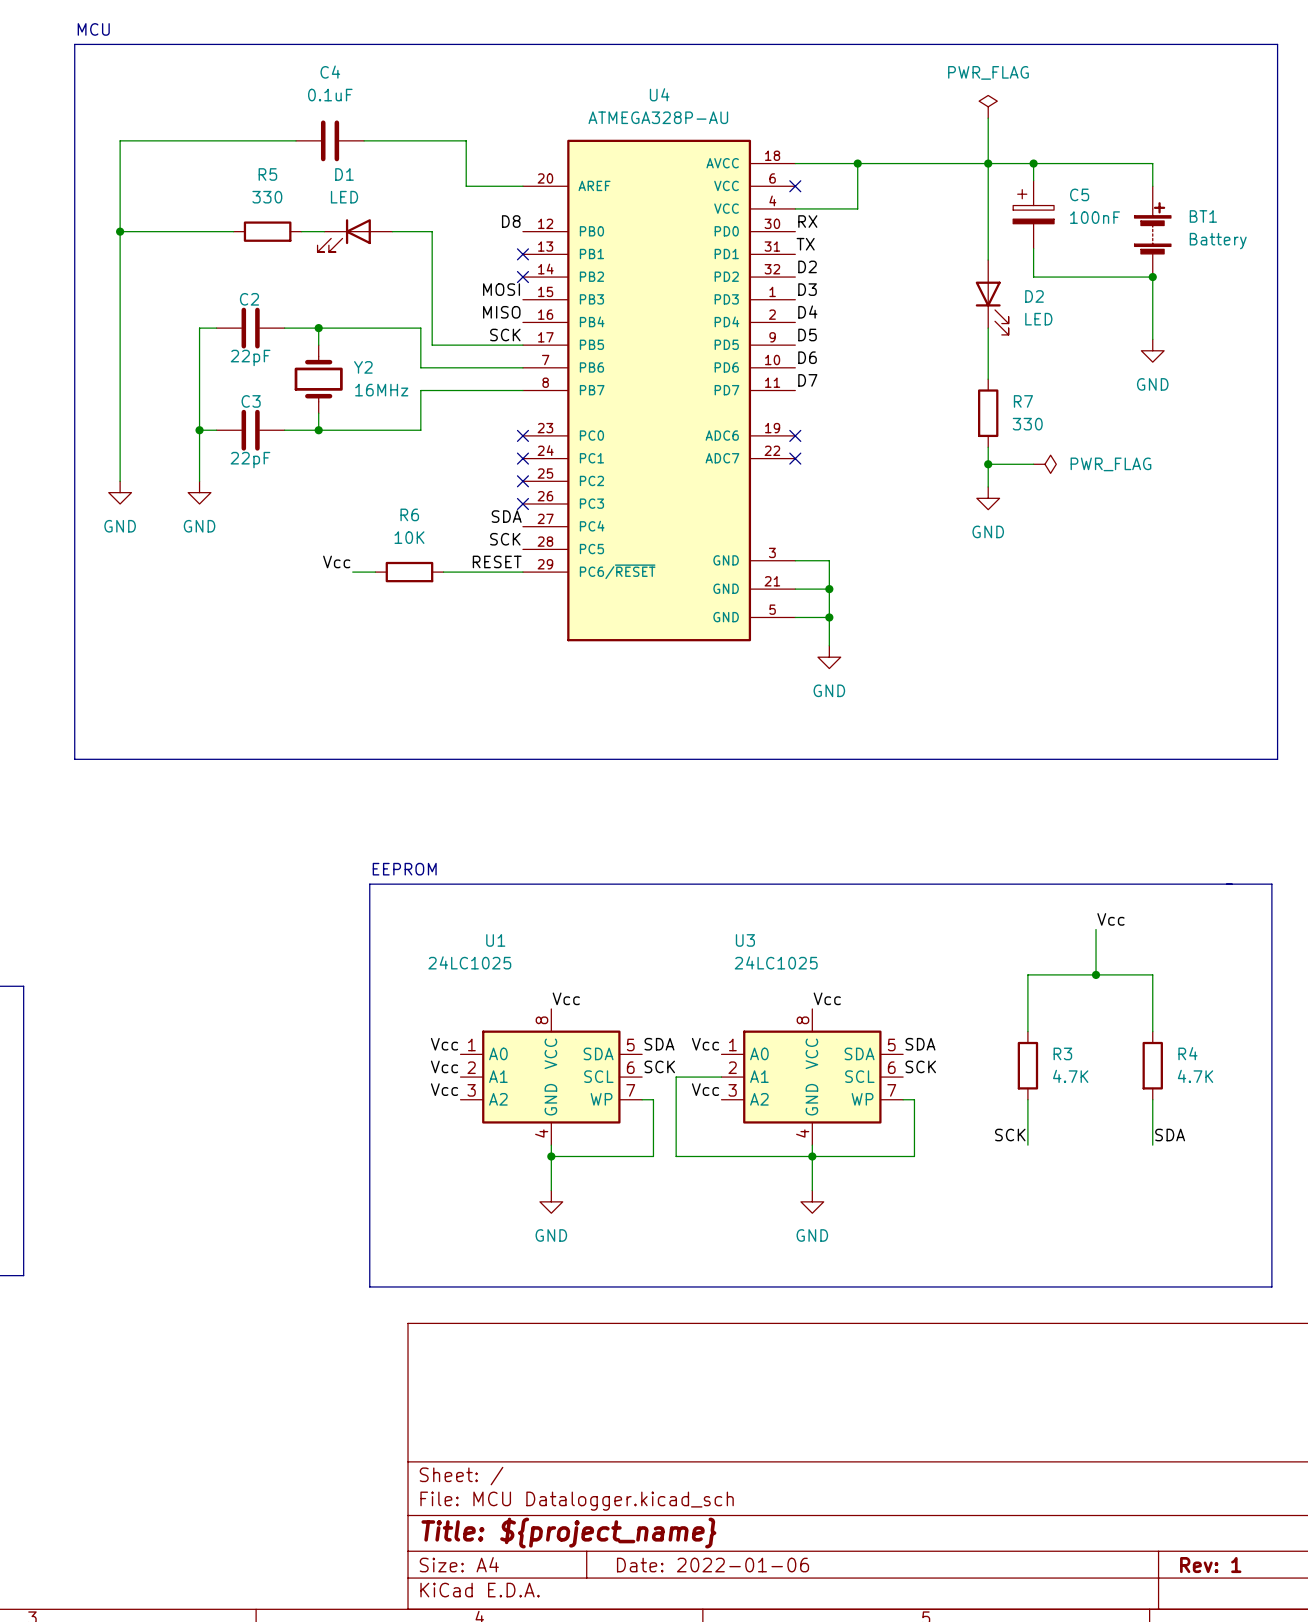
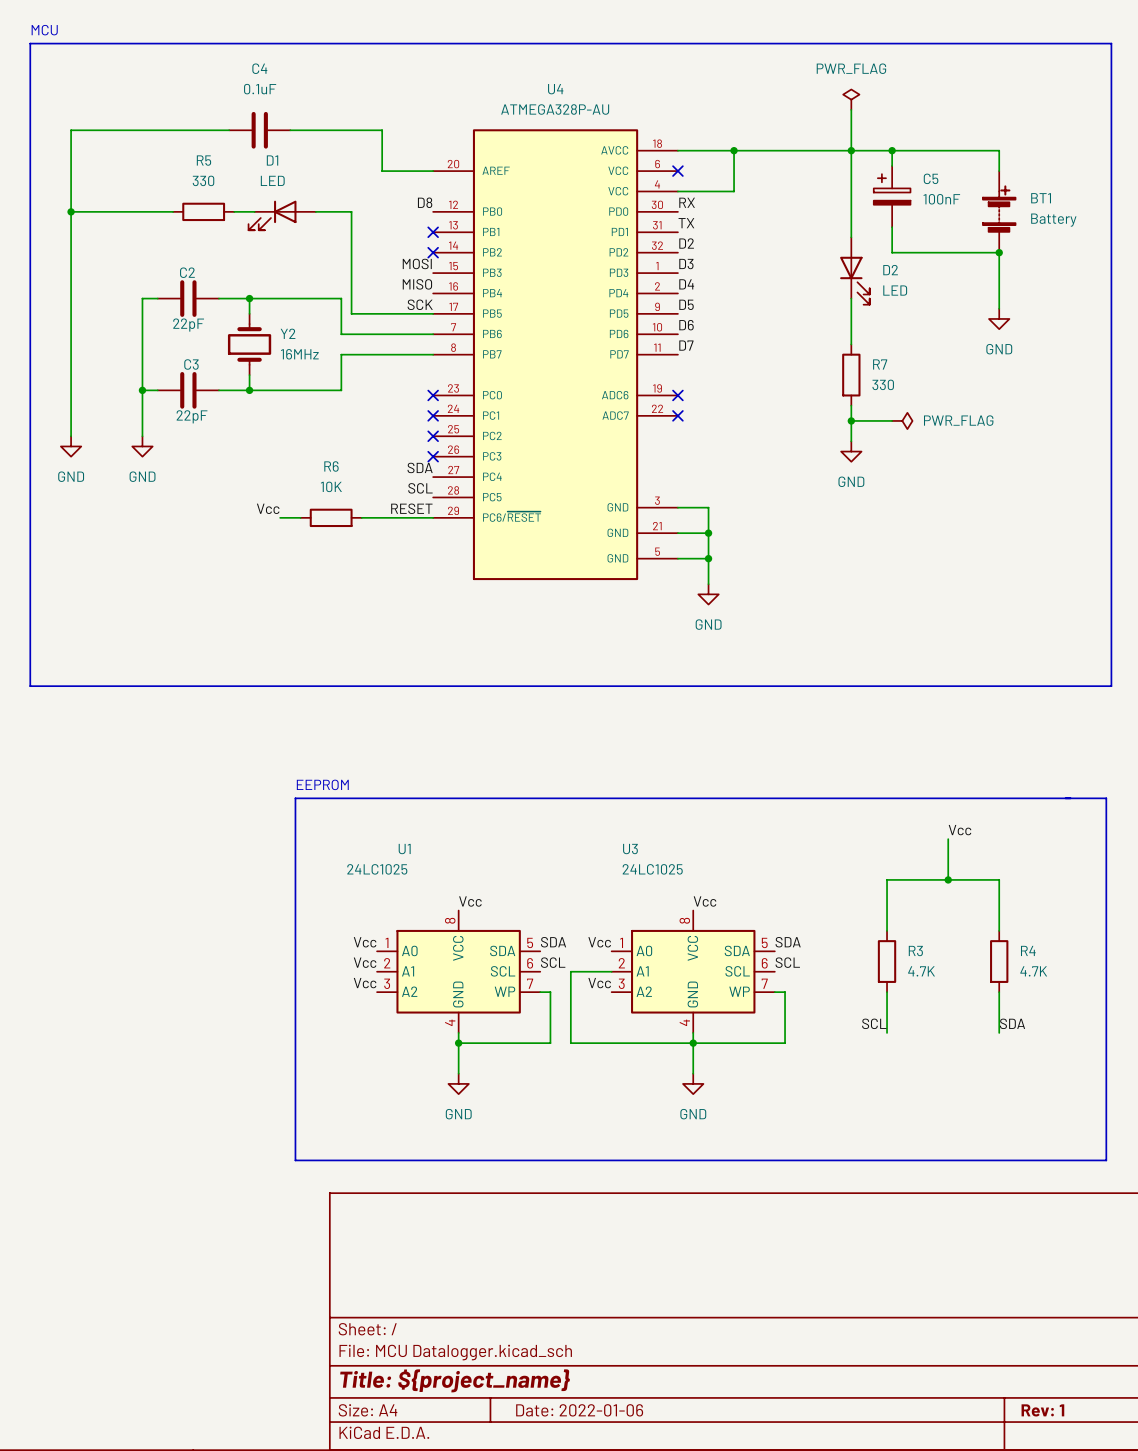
label: SCK (505, 539) -> SCL (420, 488)
label: SCK (659, 1066) -> SCL (553, 962)
label: SCK (920, 1066) -> SCL (787, 962)
label: SCK (1010, 1135) -> SCL (874, 1023)

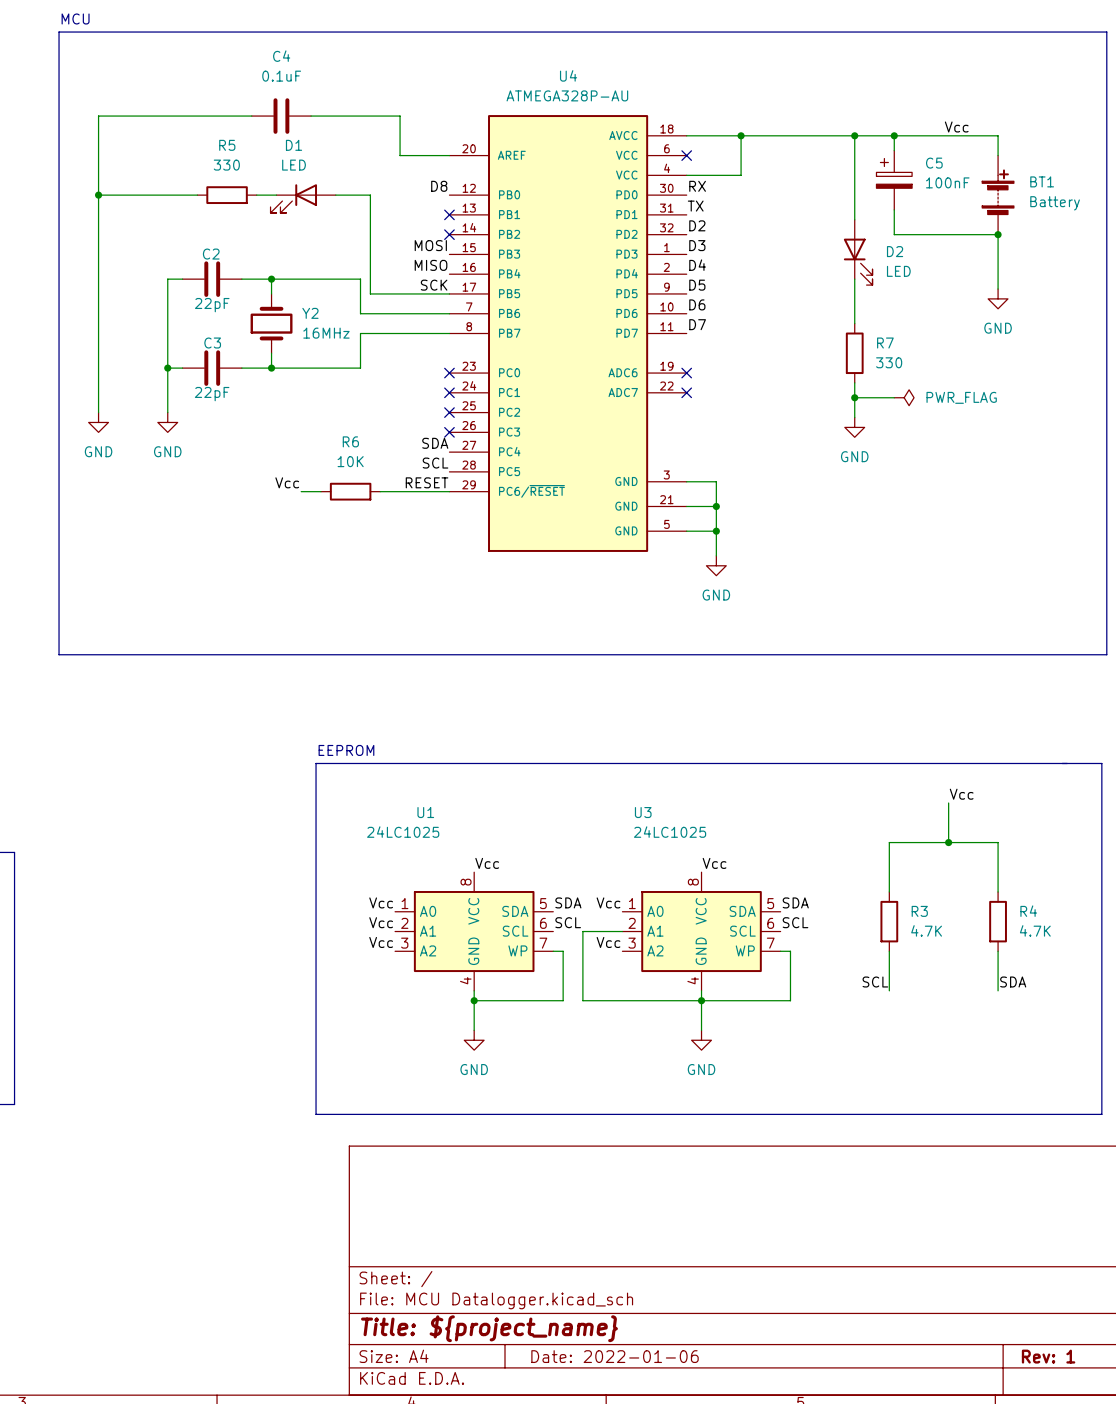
power symbol: PWR_FLAG (851, 99) -> none
wire: (851, 109) (851, 150) -> none
label: none -> Vcc (956, 126)

